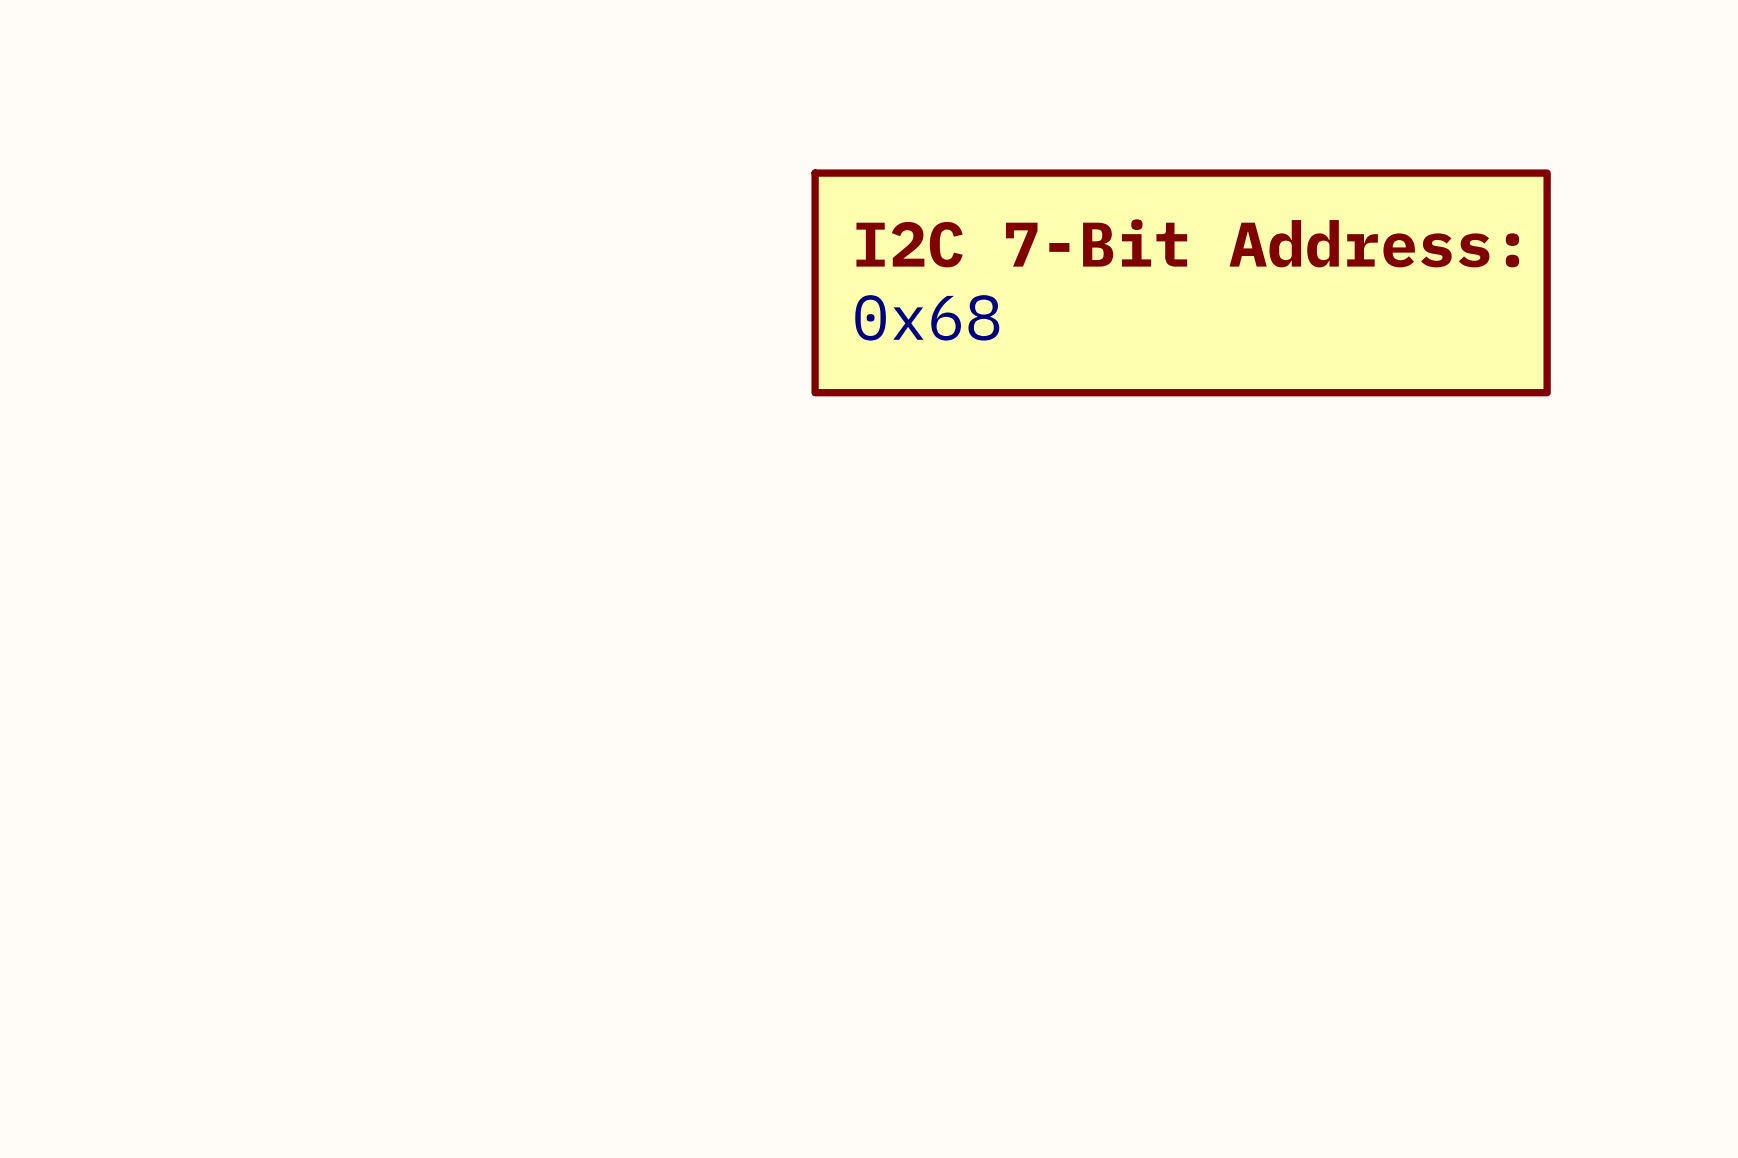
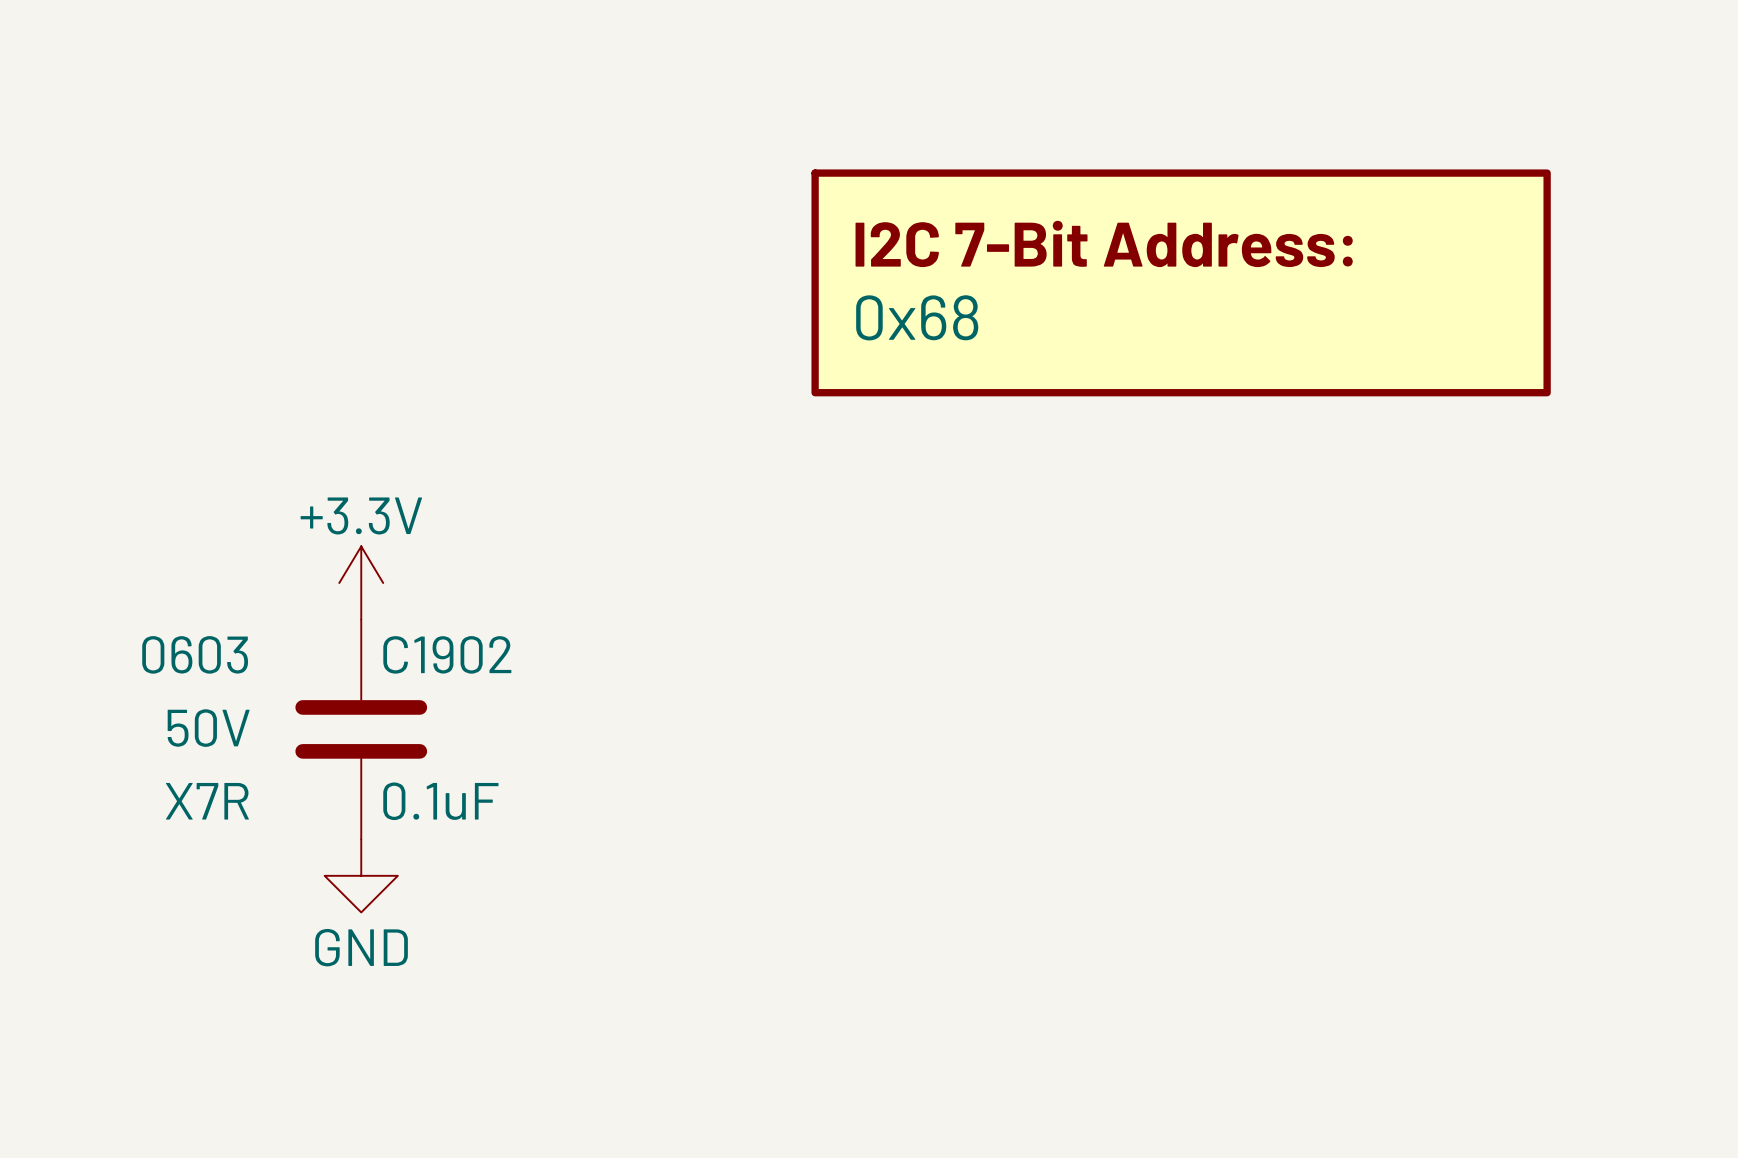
power symbol: none -> +3.3V (361, 583)
C1902: none -> 0.1uF (361, 729)
power symbol: none -> GND (361, 875)

